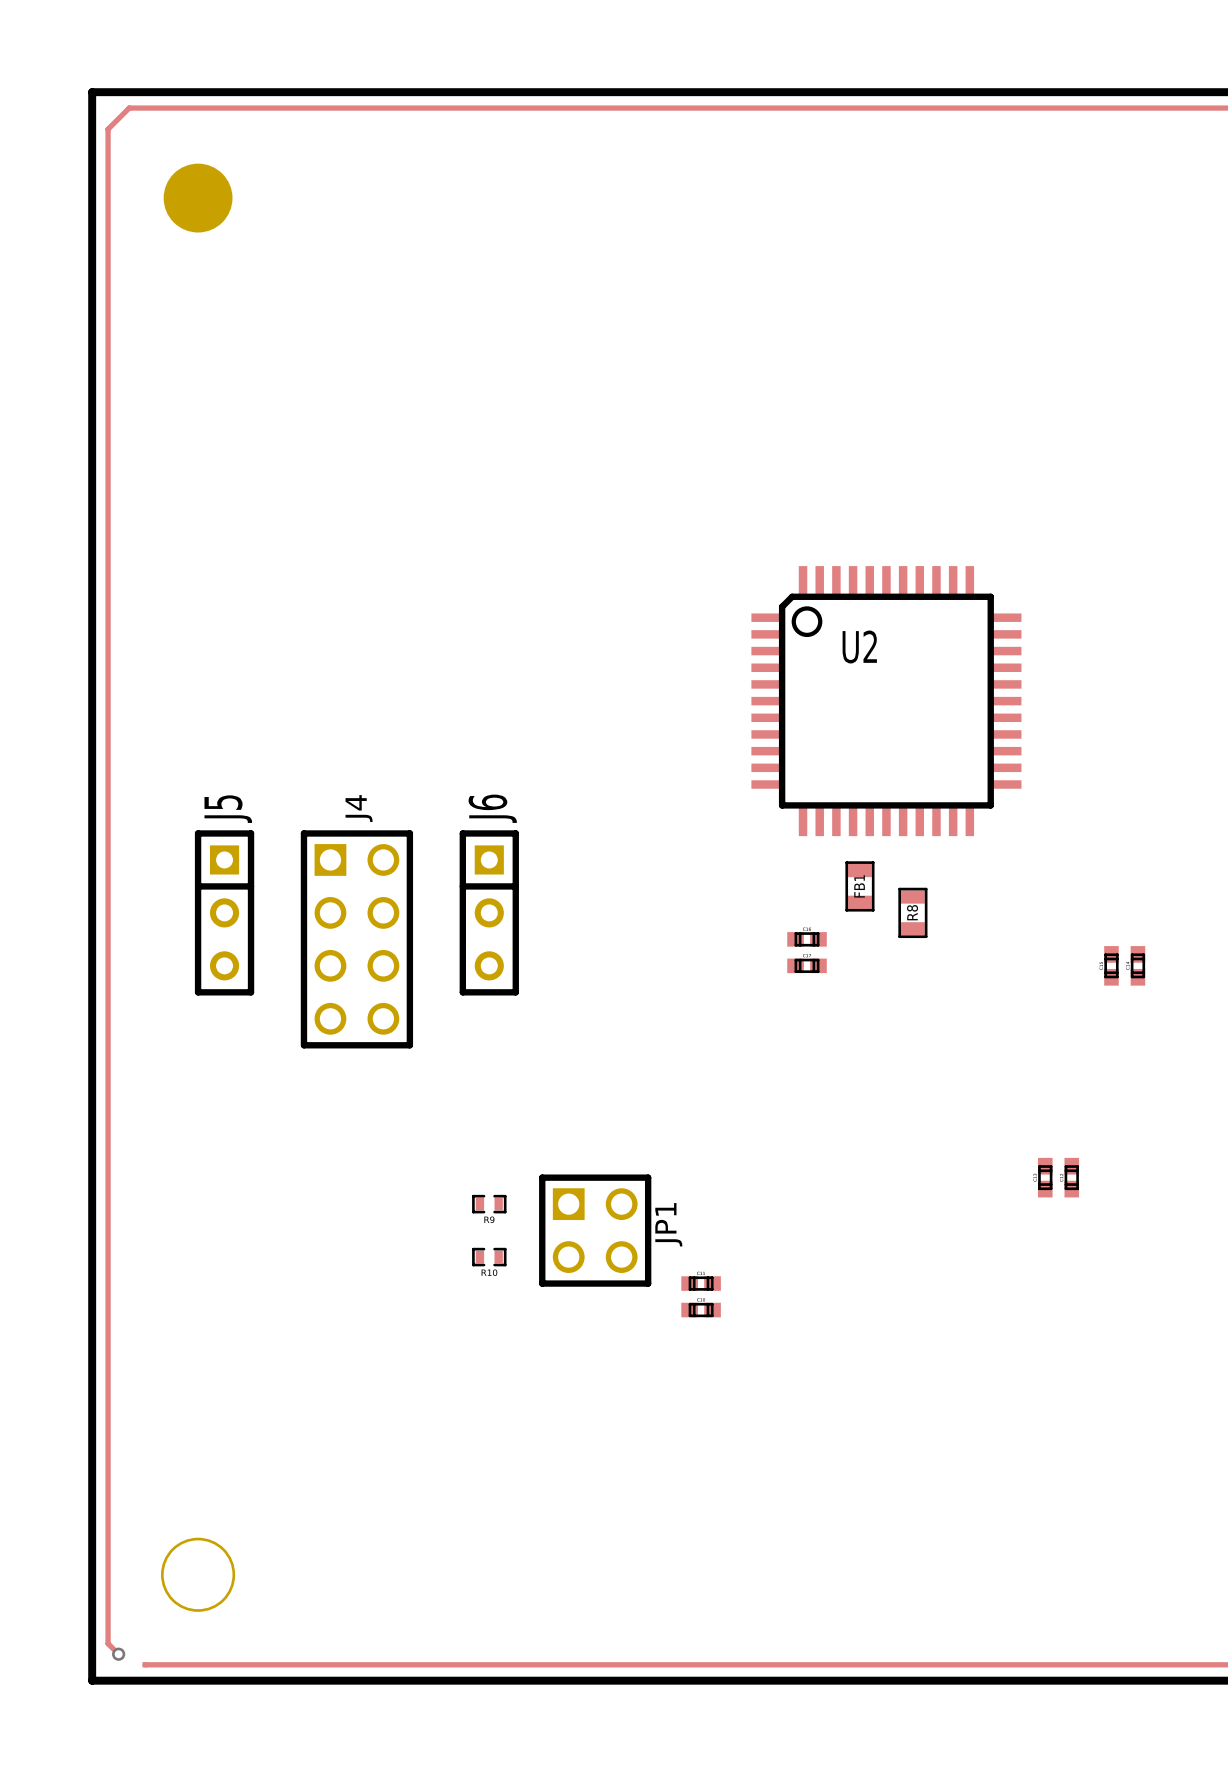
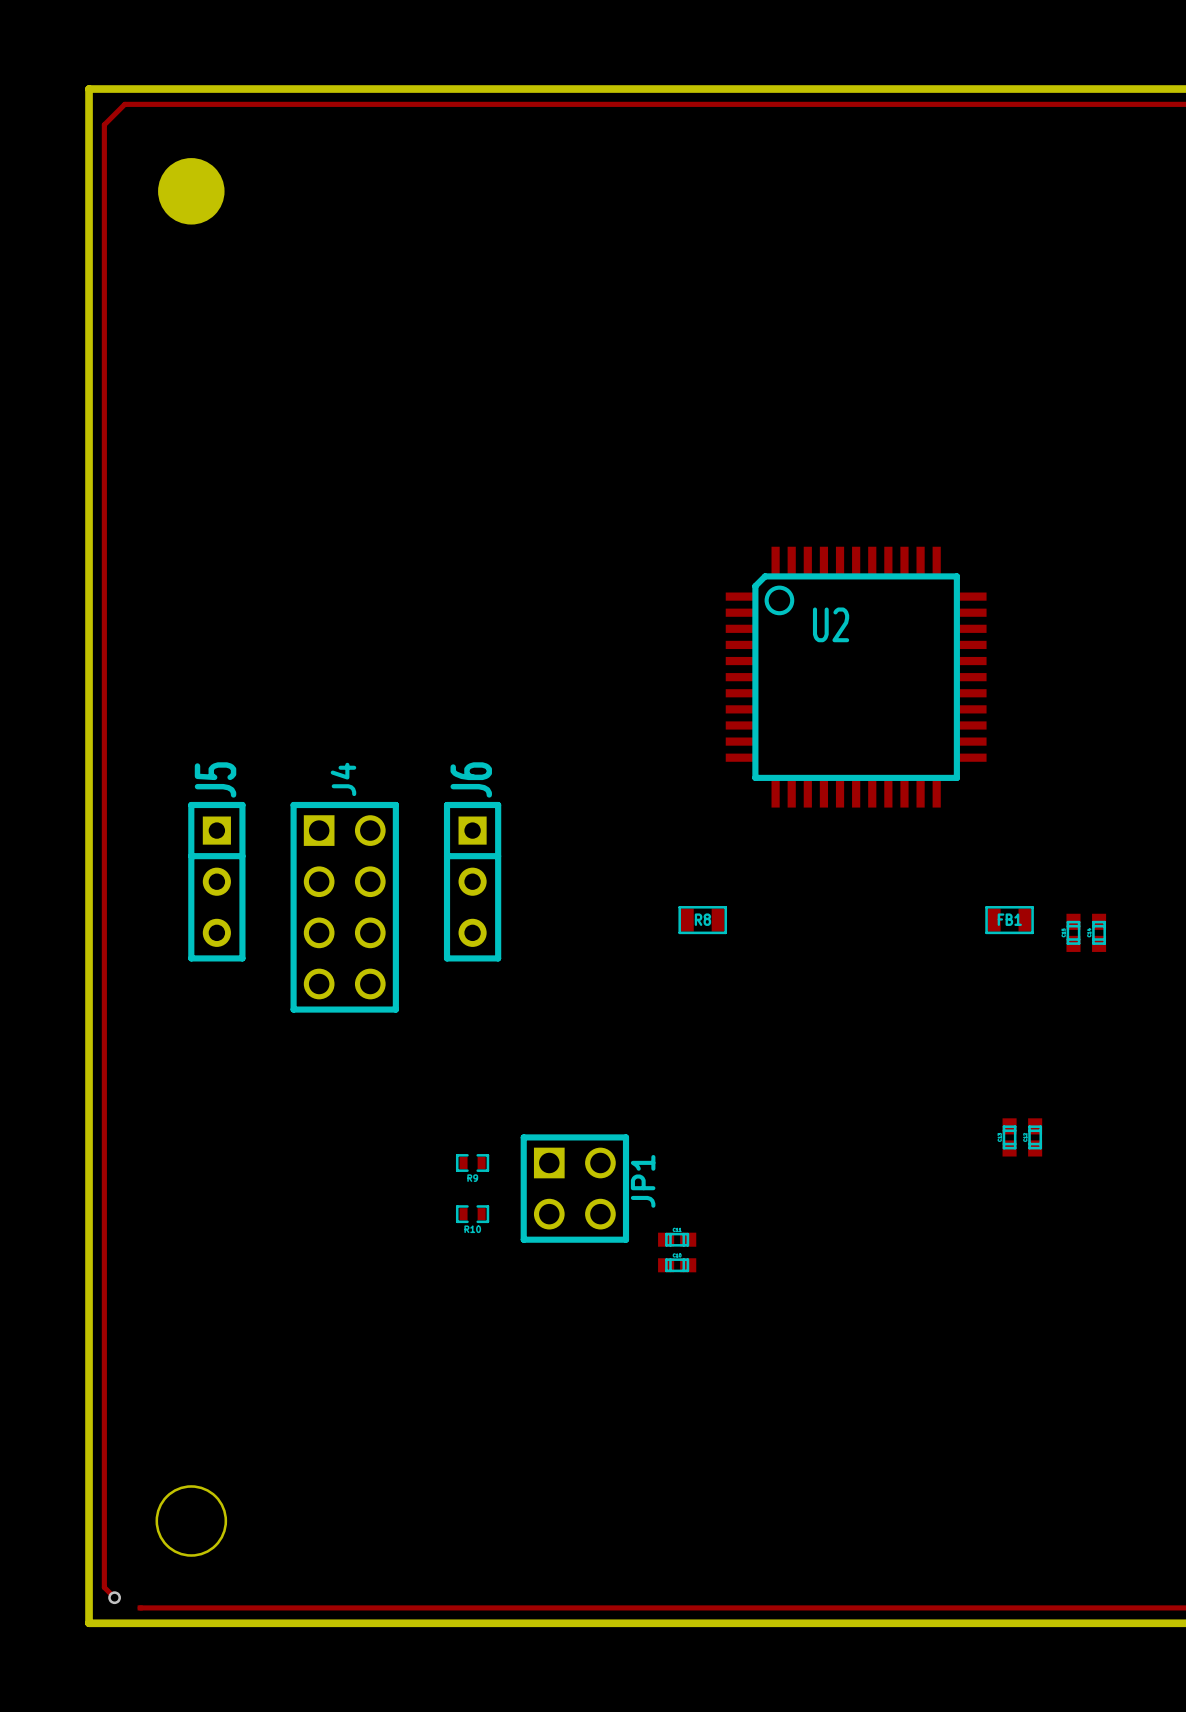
FB1 rotation: 0° (859, 886) -> 90° clockwise (1009, 920)
FB1 position: (859, 886) -> (1009, 920)
R8 rotation: 0° (912, 912) -> 90° clockwise (702, 920)
R8 position: (912, 912) -> (702, 920)
part: (807, 939) -> none
part: (807, 965) -> none

